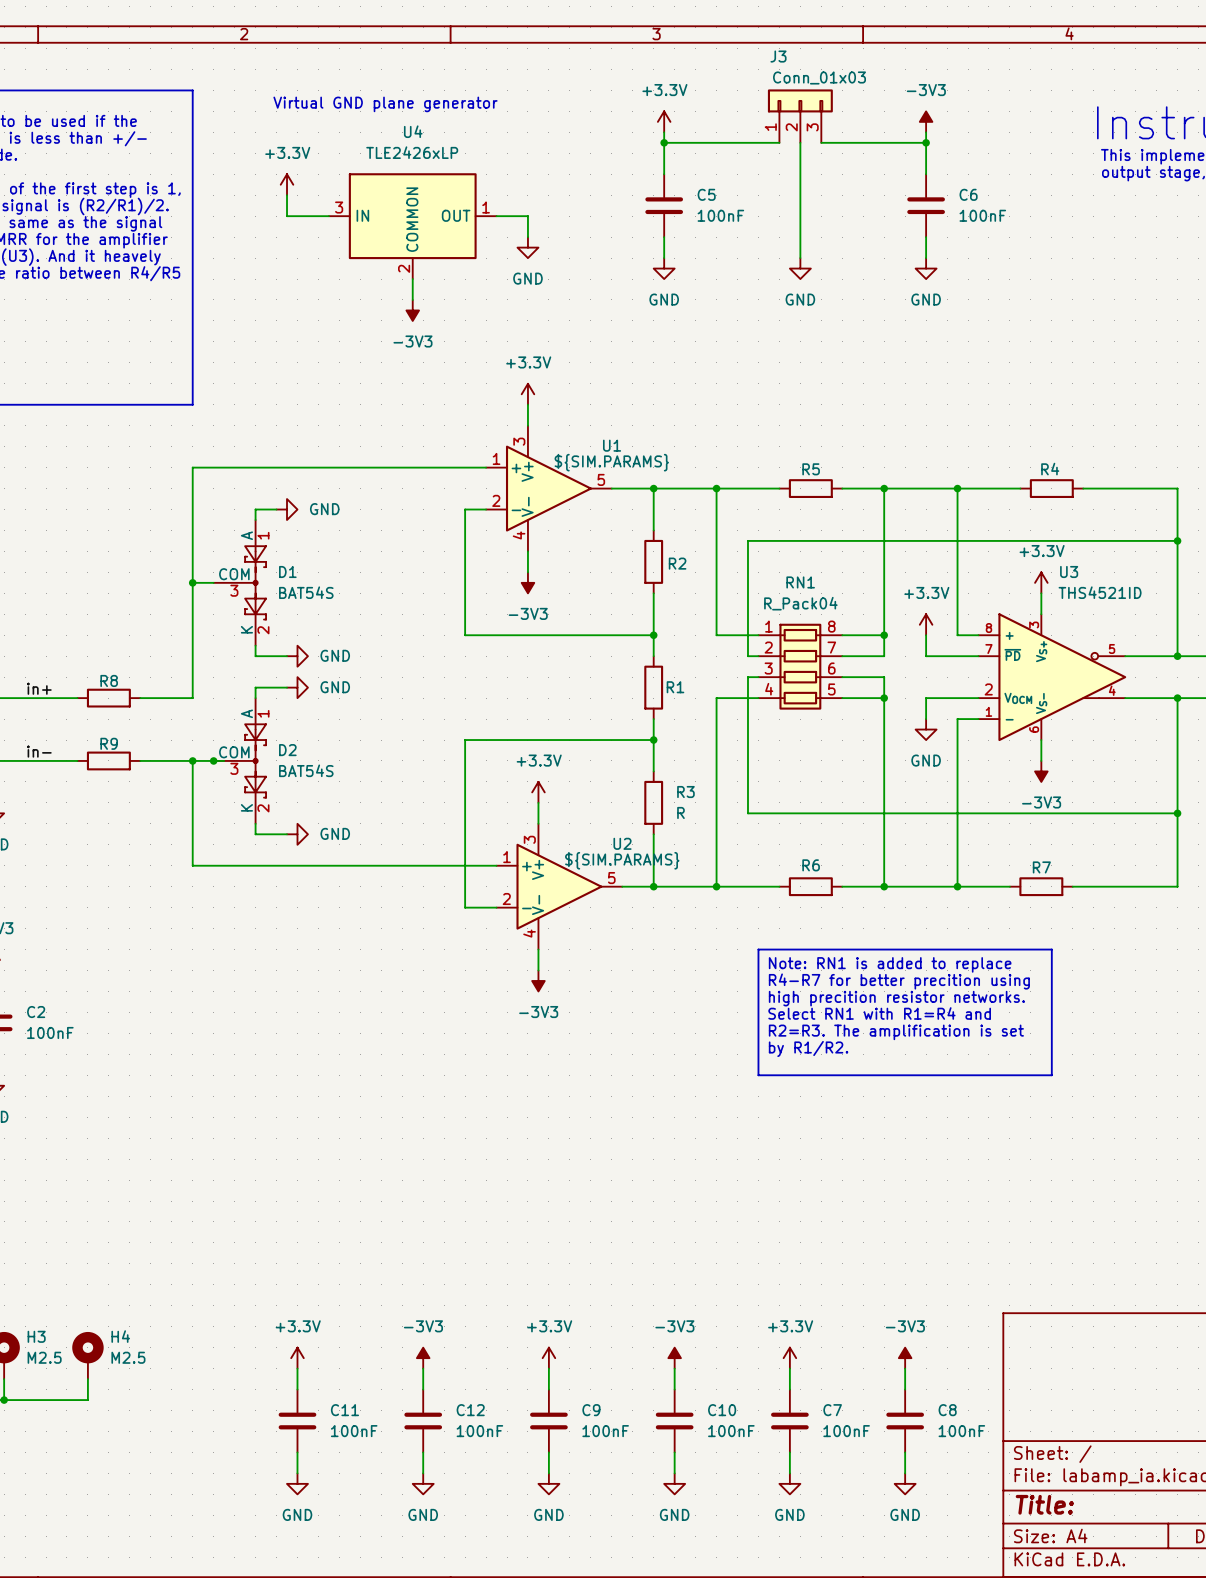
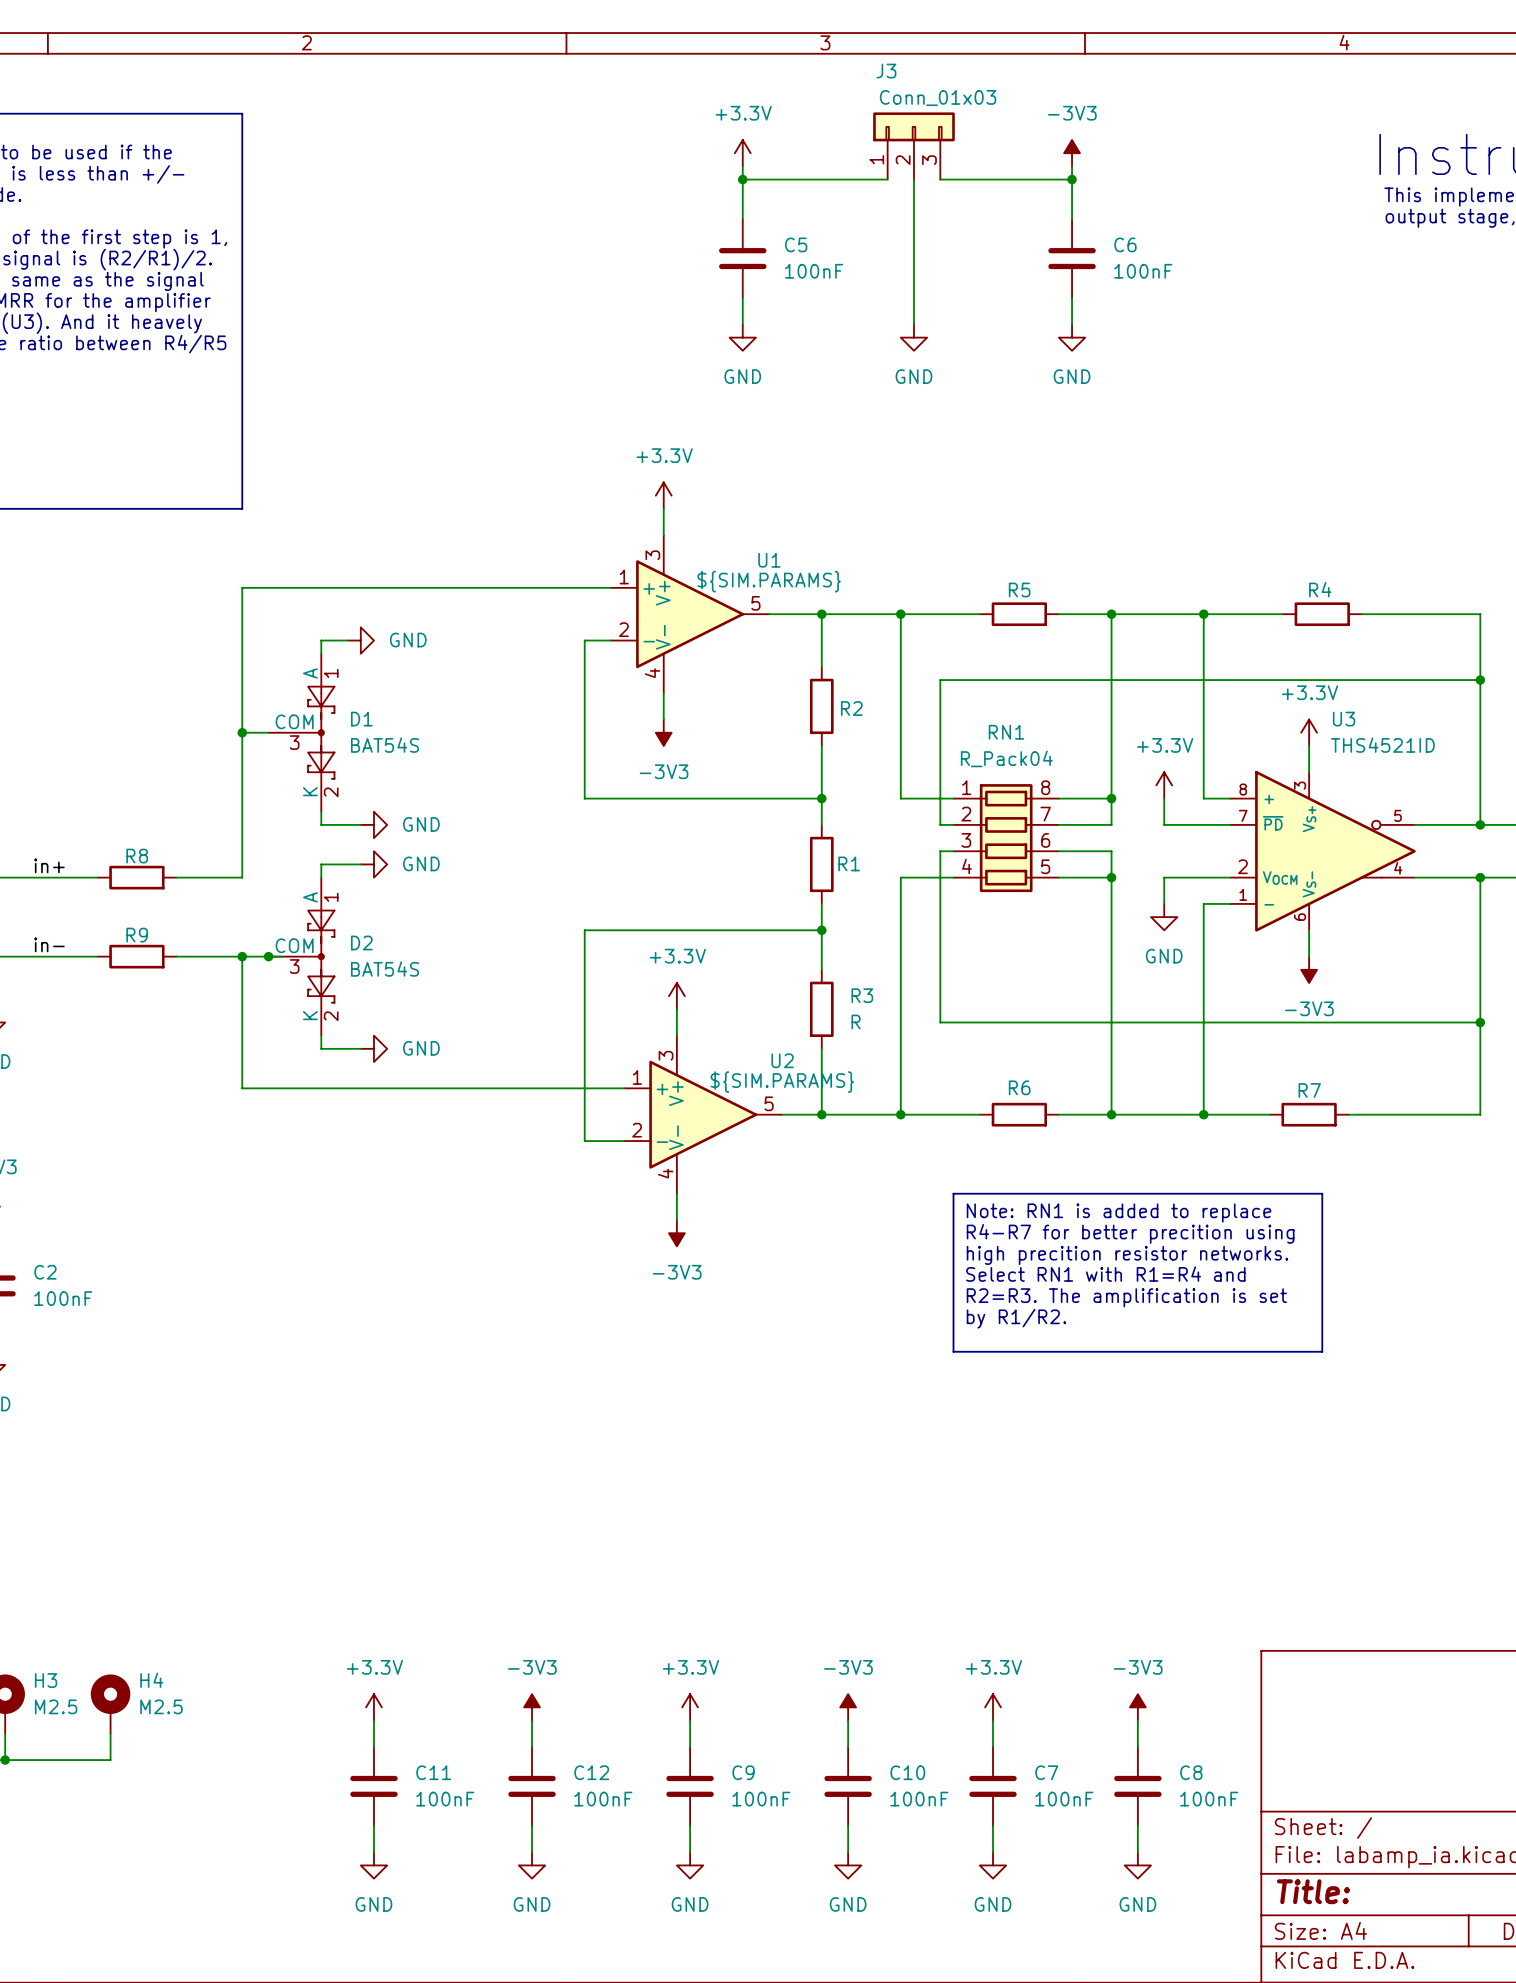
text: Virtual GND plane generator (385, 104) -> none
J3 position: (800, 116) -> (913, 145)
power symbol position: +3.3V (664, 121) -> +3.3V (742, 153)
power symbol position: -3V3 (926, 121) -> -3V3 (1072, 153)
wire: (664, 132) (664, 174) -> (742, 166) (742, 219)
wire: (926, 132) (926, 174) -> (1072, 166) (1072, 219)
wire: none -> (742, 179) (834, 179)
junction: none -> (742, 179)
junction: (664, 142) -> none
wire: (706, 142) (747, 142) -> (979, 179) (1032, 179)
wire: (800, 142) (800, 258) -> (913, 179) (913, 324)
wire: (852, 142) (926, 142) -> none
junction: none -> (1072, 179)
junction: (926, 142) -> none
power symbol: +3.3V (287, 184) -> none
wire: (287, 195) (287, 216) (328, 216) -> none
C5 position: (664, 205) -> (742, 258)
C6 position: (926, 205) -> (1072, 258)
wire: (496, 216) (527, 216) (527, 237) -> none
U4: TLE2426xLP (412, 226) -> none
wire: (664, 237) (664, 258) -> (742, 298) (742, 324)
wire: (926, 237) (926, 258) -> (1072, 298) (1072, 324)
power symbol: GND (527, 247) -> none
power symbol: none -> GND (742, 337)
power symbol: GND (664, 268) -> none
power symbol: none -> GND (913, 337)
power symbol: GND (800, 268) -> none
power symbol: none -> GND (1072, 337)
power symbol: GND (926, 268) -> none
wire: (412, 279) (412, 299) -> none
power symbol: -3V3 (412, 310) -> none

